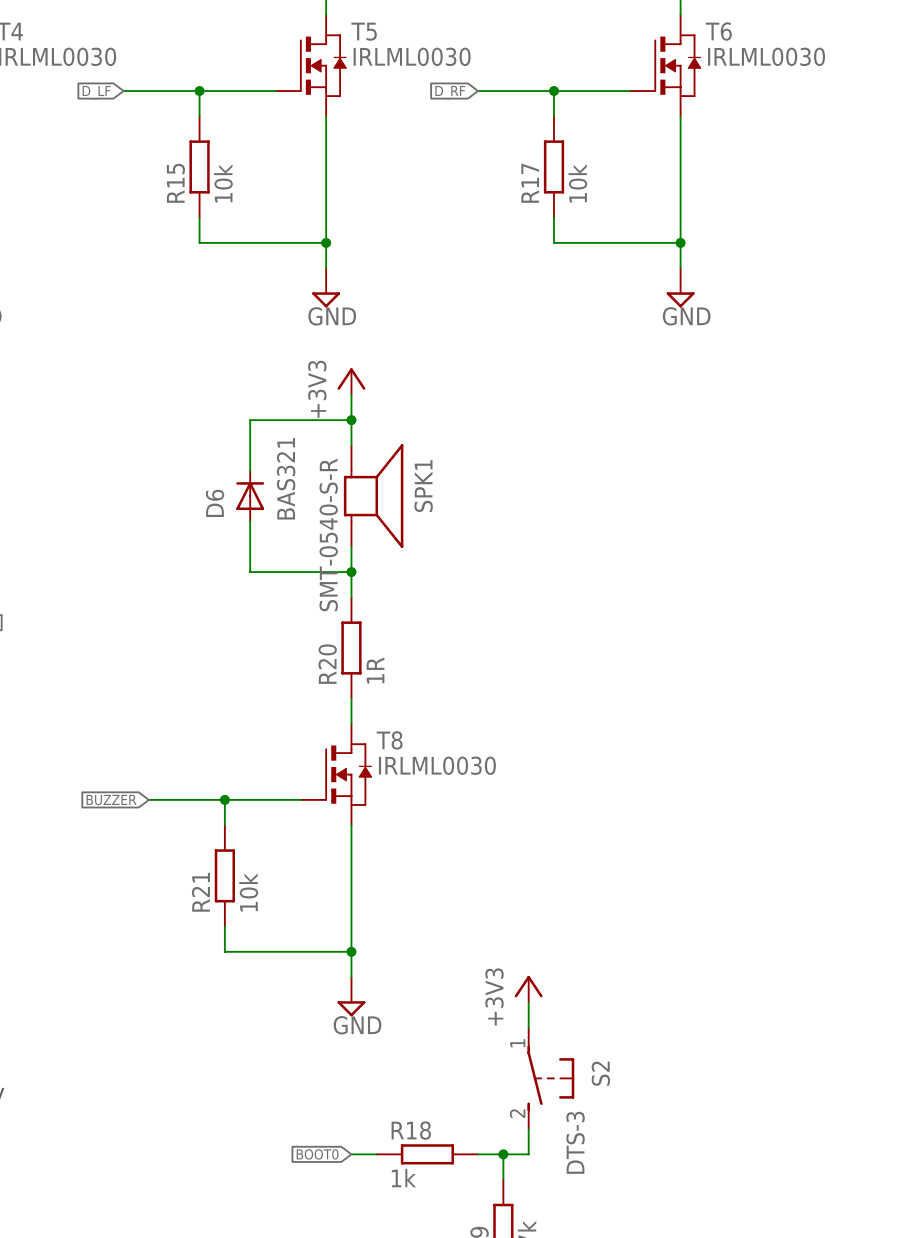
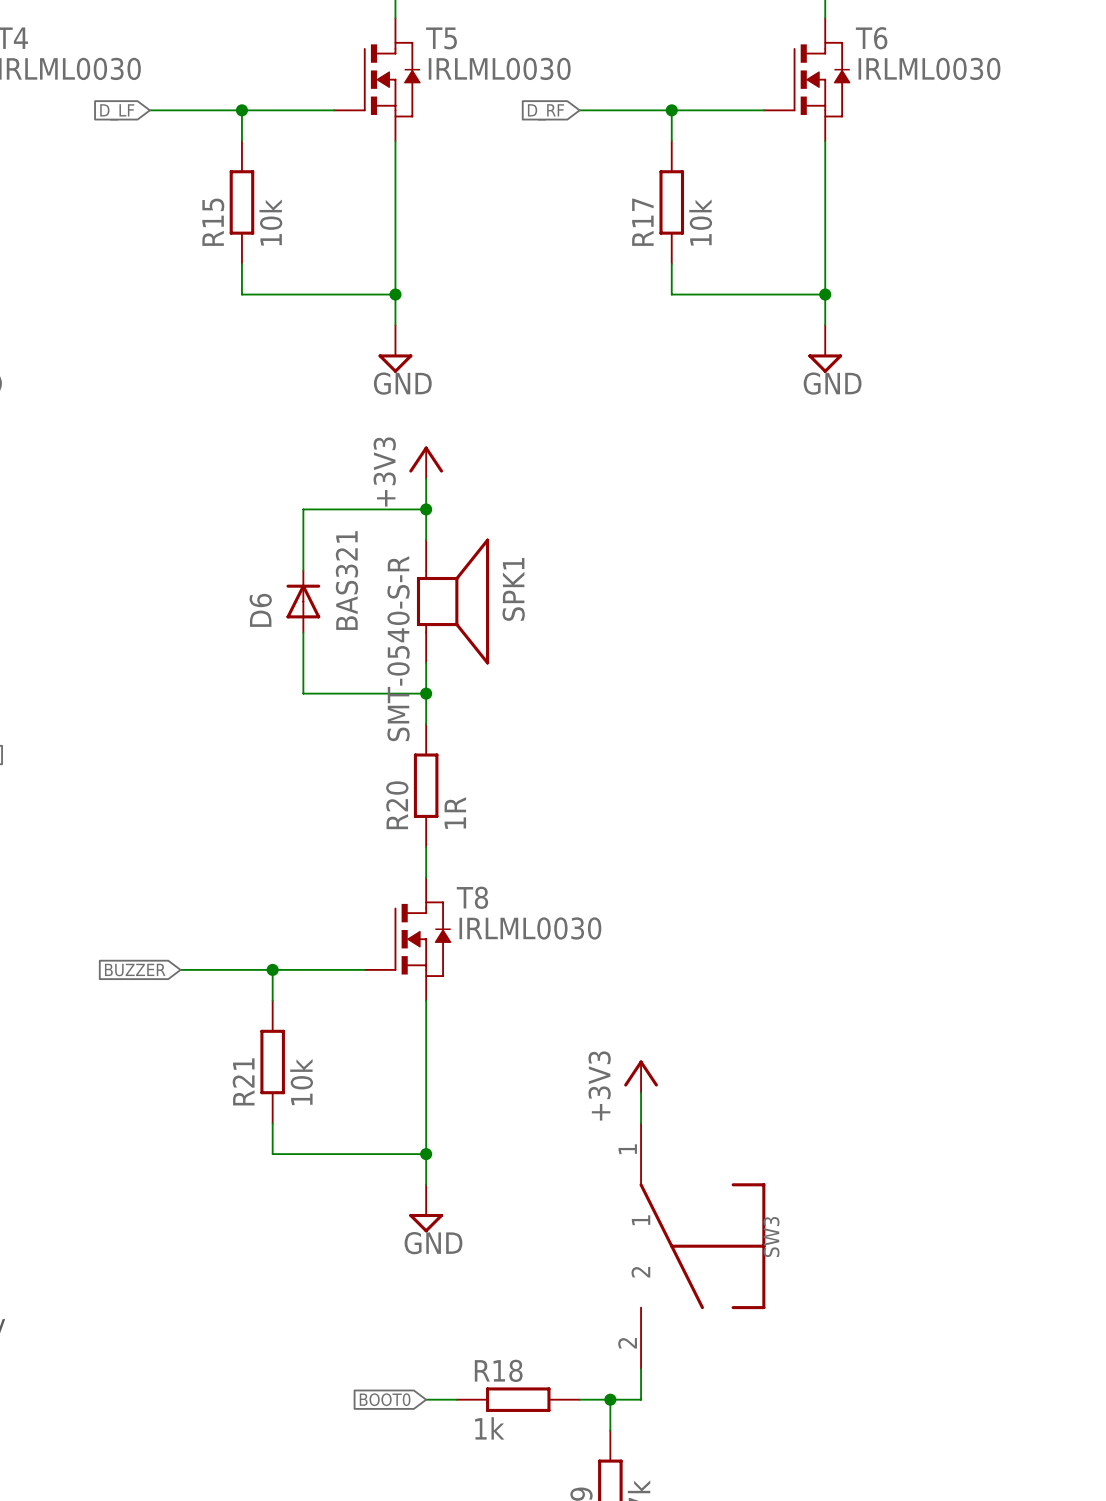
power symbol position: +3V3 (528, 989) -> +3V3 (641, 1076)
wire: (528, 1002) (528, 1027) -> (641, 1092) (641, 1123)
SW3: none -> (702, 1246)
S2: DTS-3 (550, 1078) -> none

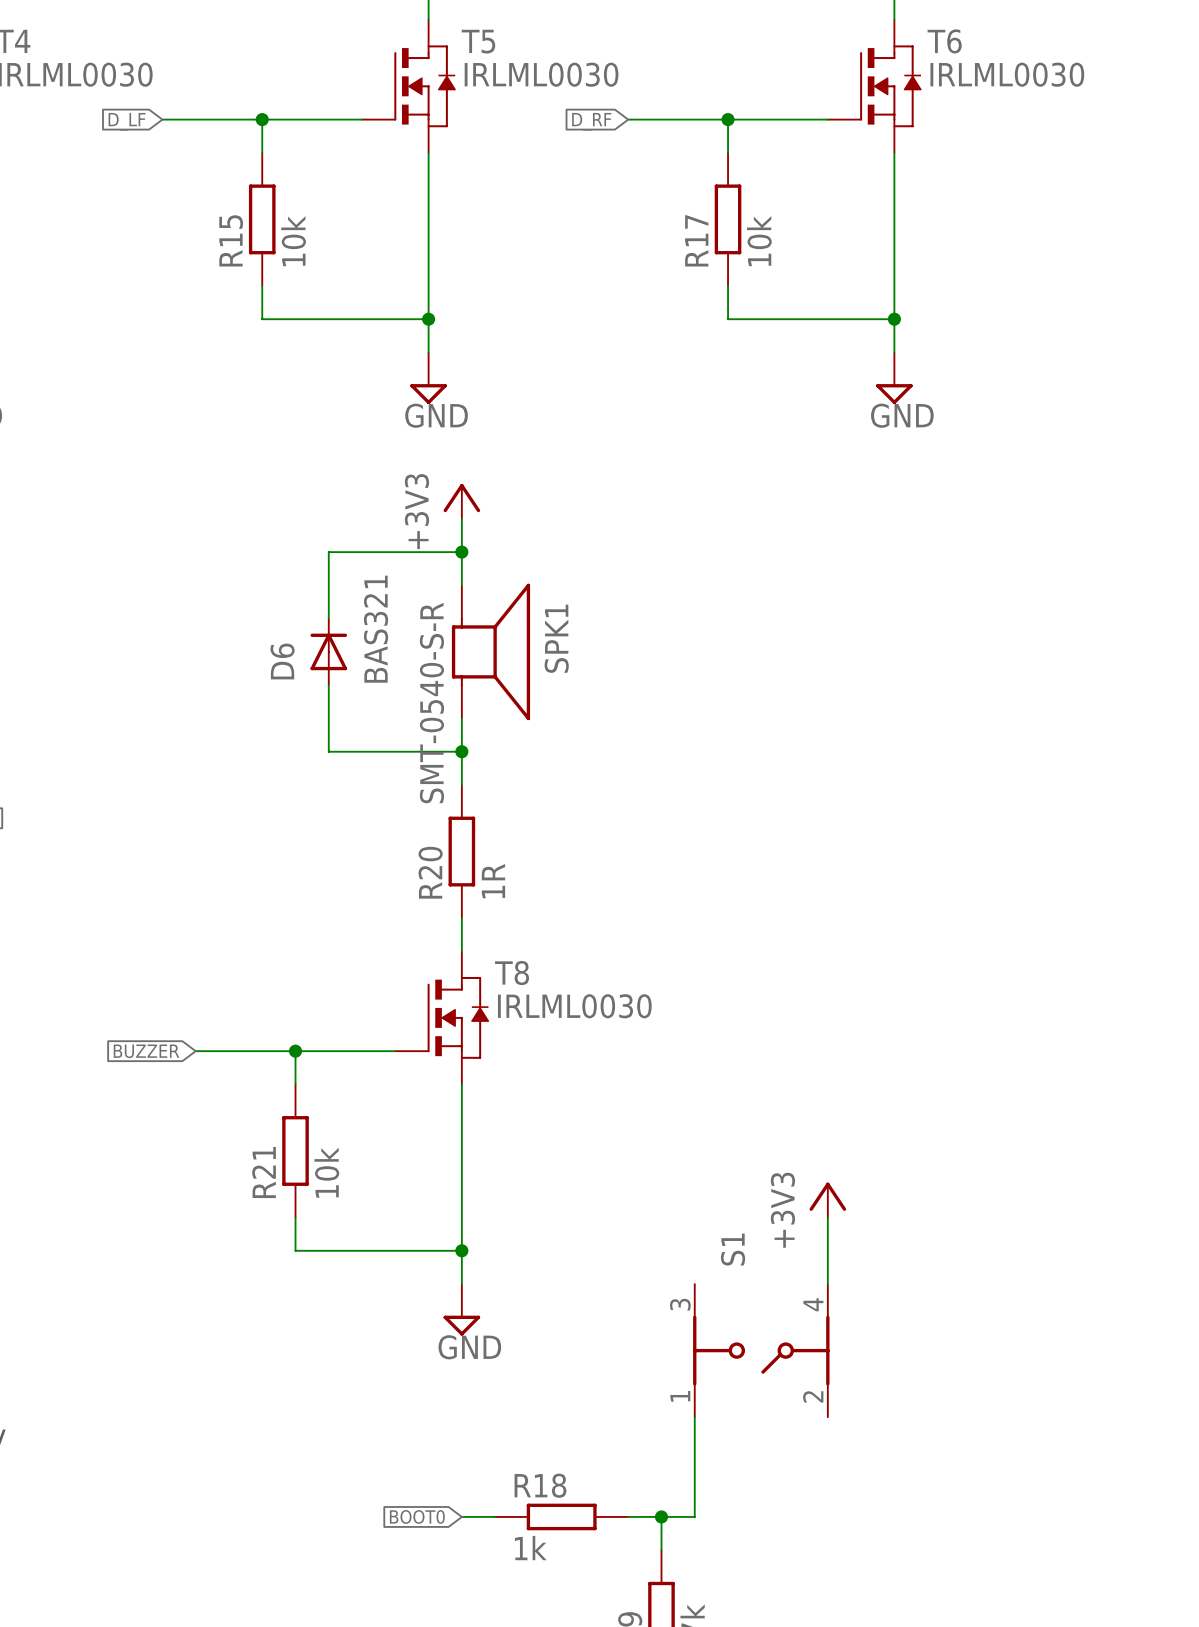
power symbol position: +3V3 (641, 1076) -> +3V3 (827, 1200)
wire: (641, 1092) (641, 1123) -> none
wire: none -> (827, 1217) (827, 1284)
SW3: (702, 1246) -> none
S1: none -> (761, 1350)

